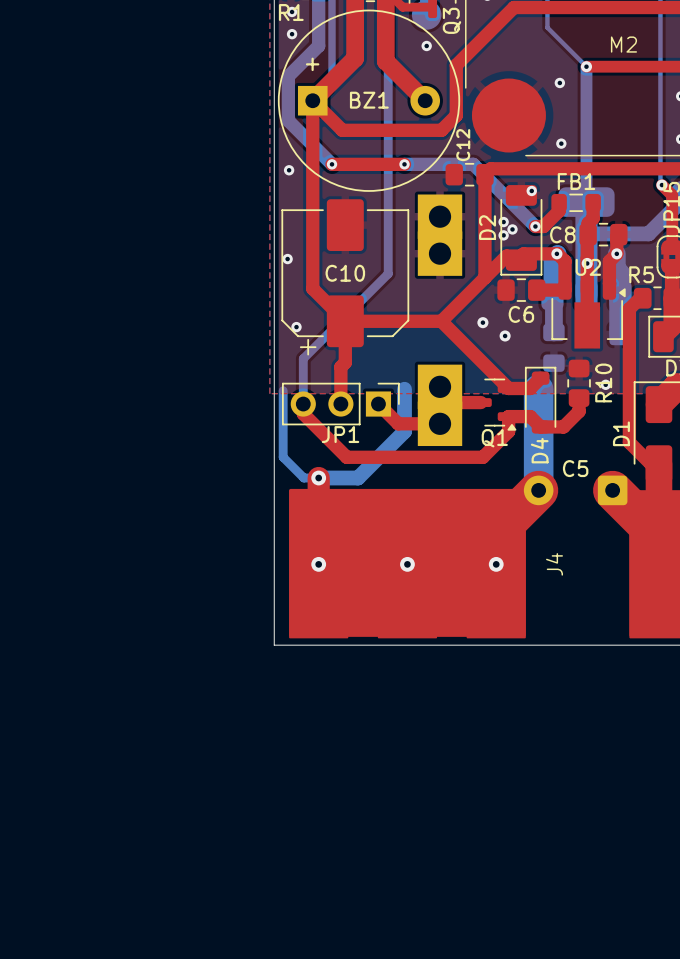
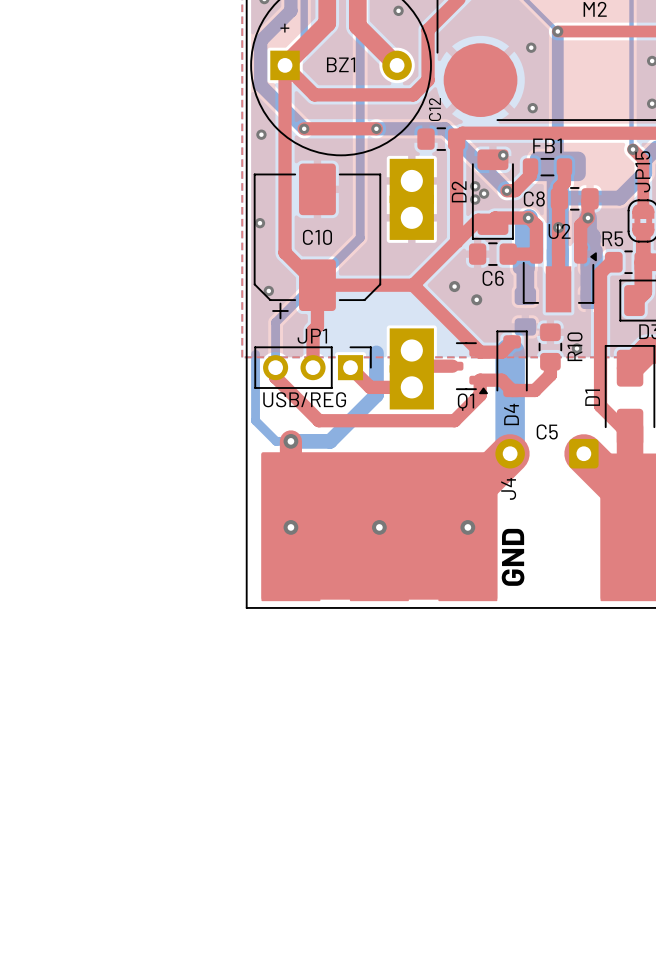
JP1 name position: JP1 (340, 434) -> JP1 (312, 336)
text: none -> USB/REG (304, 399)
J4 name position: J4 (554, 564) -> J4 (508, 488)
text: none -> GND (513, 557)

